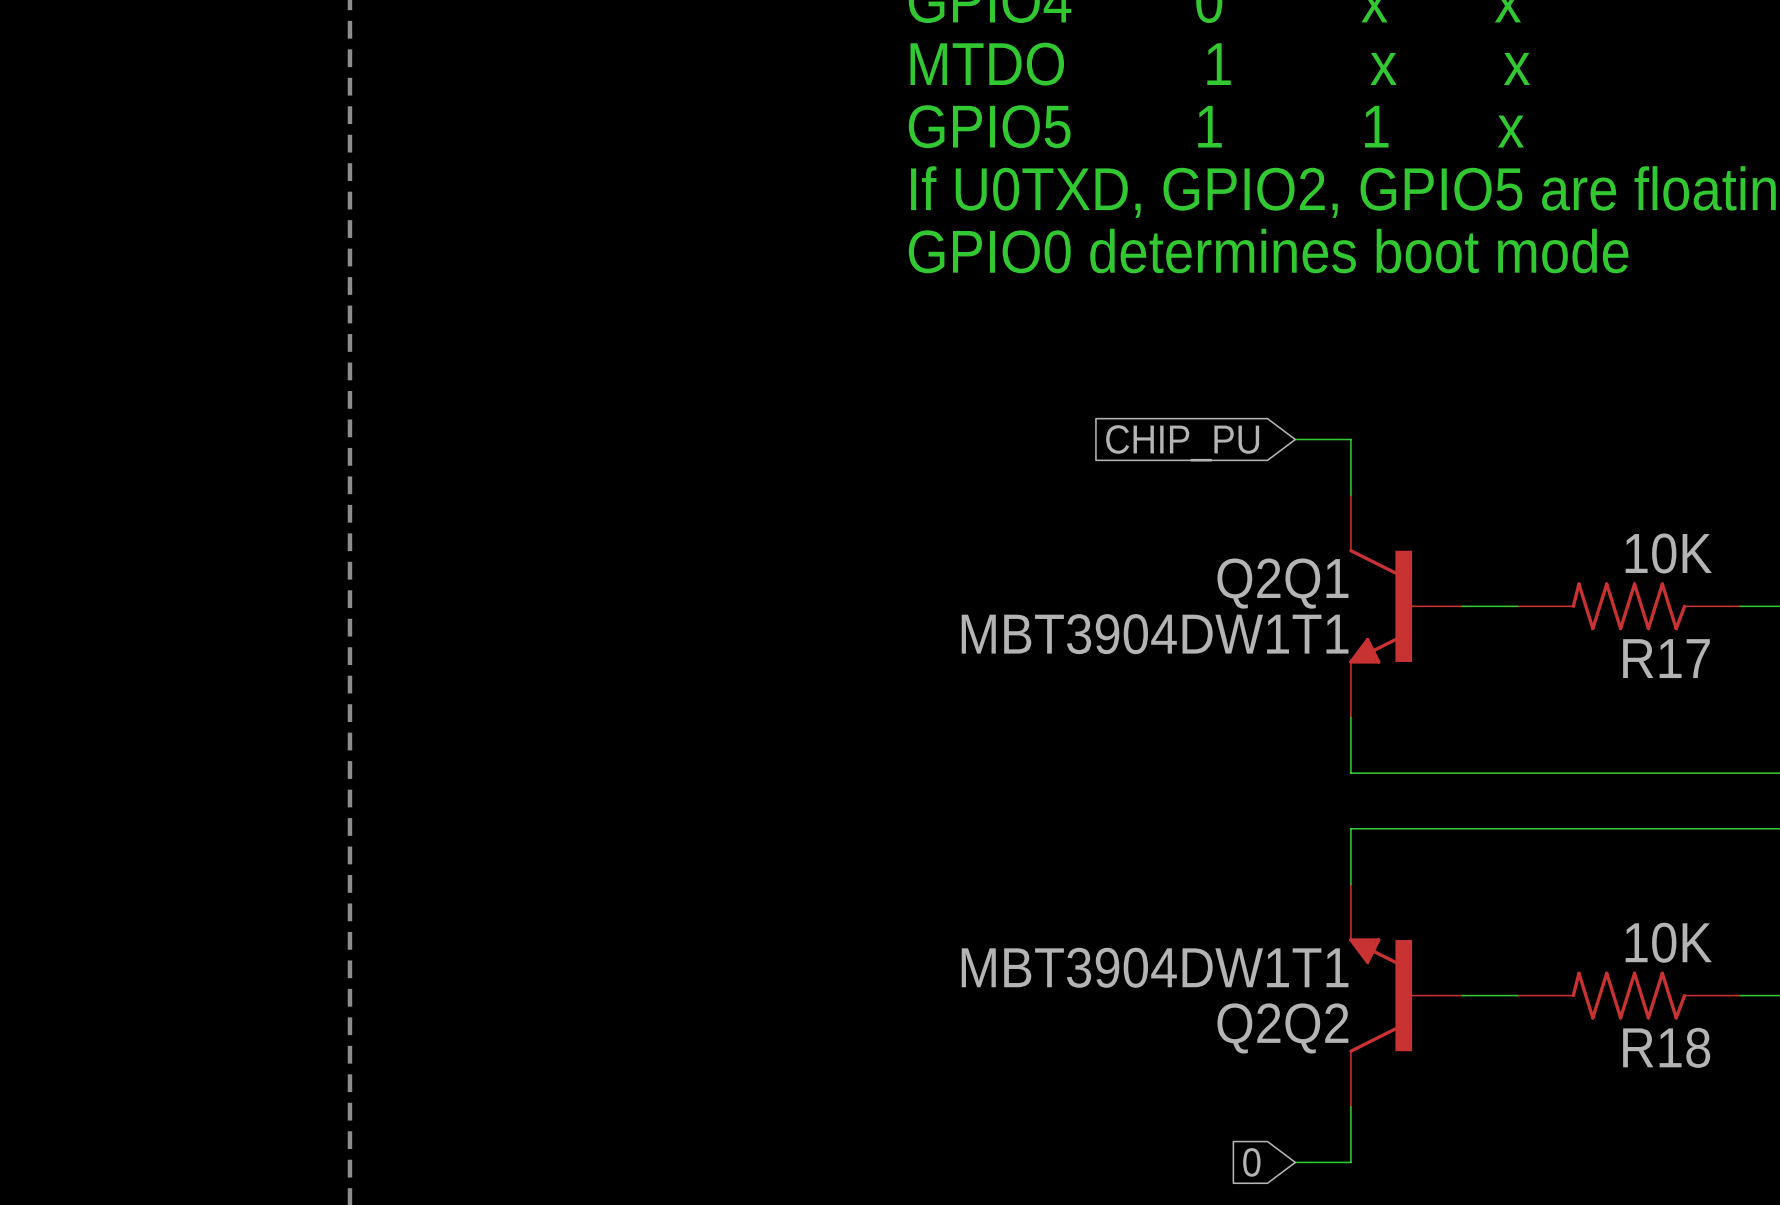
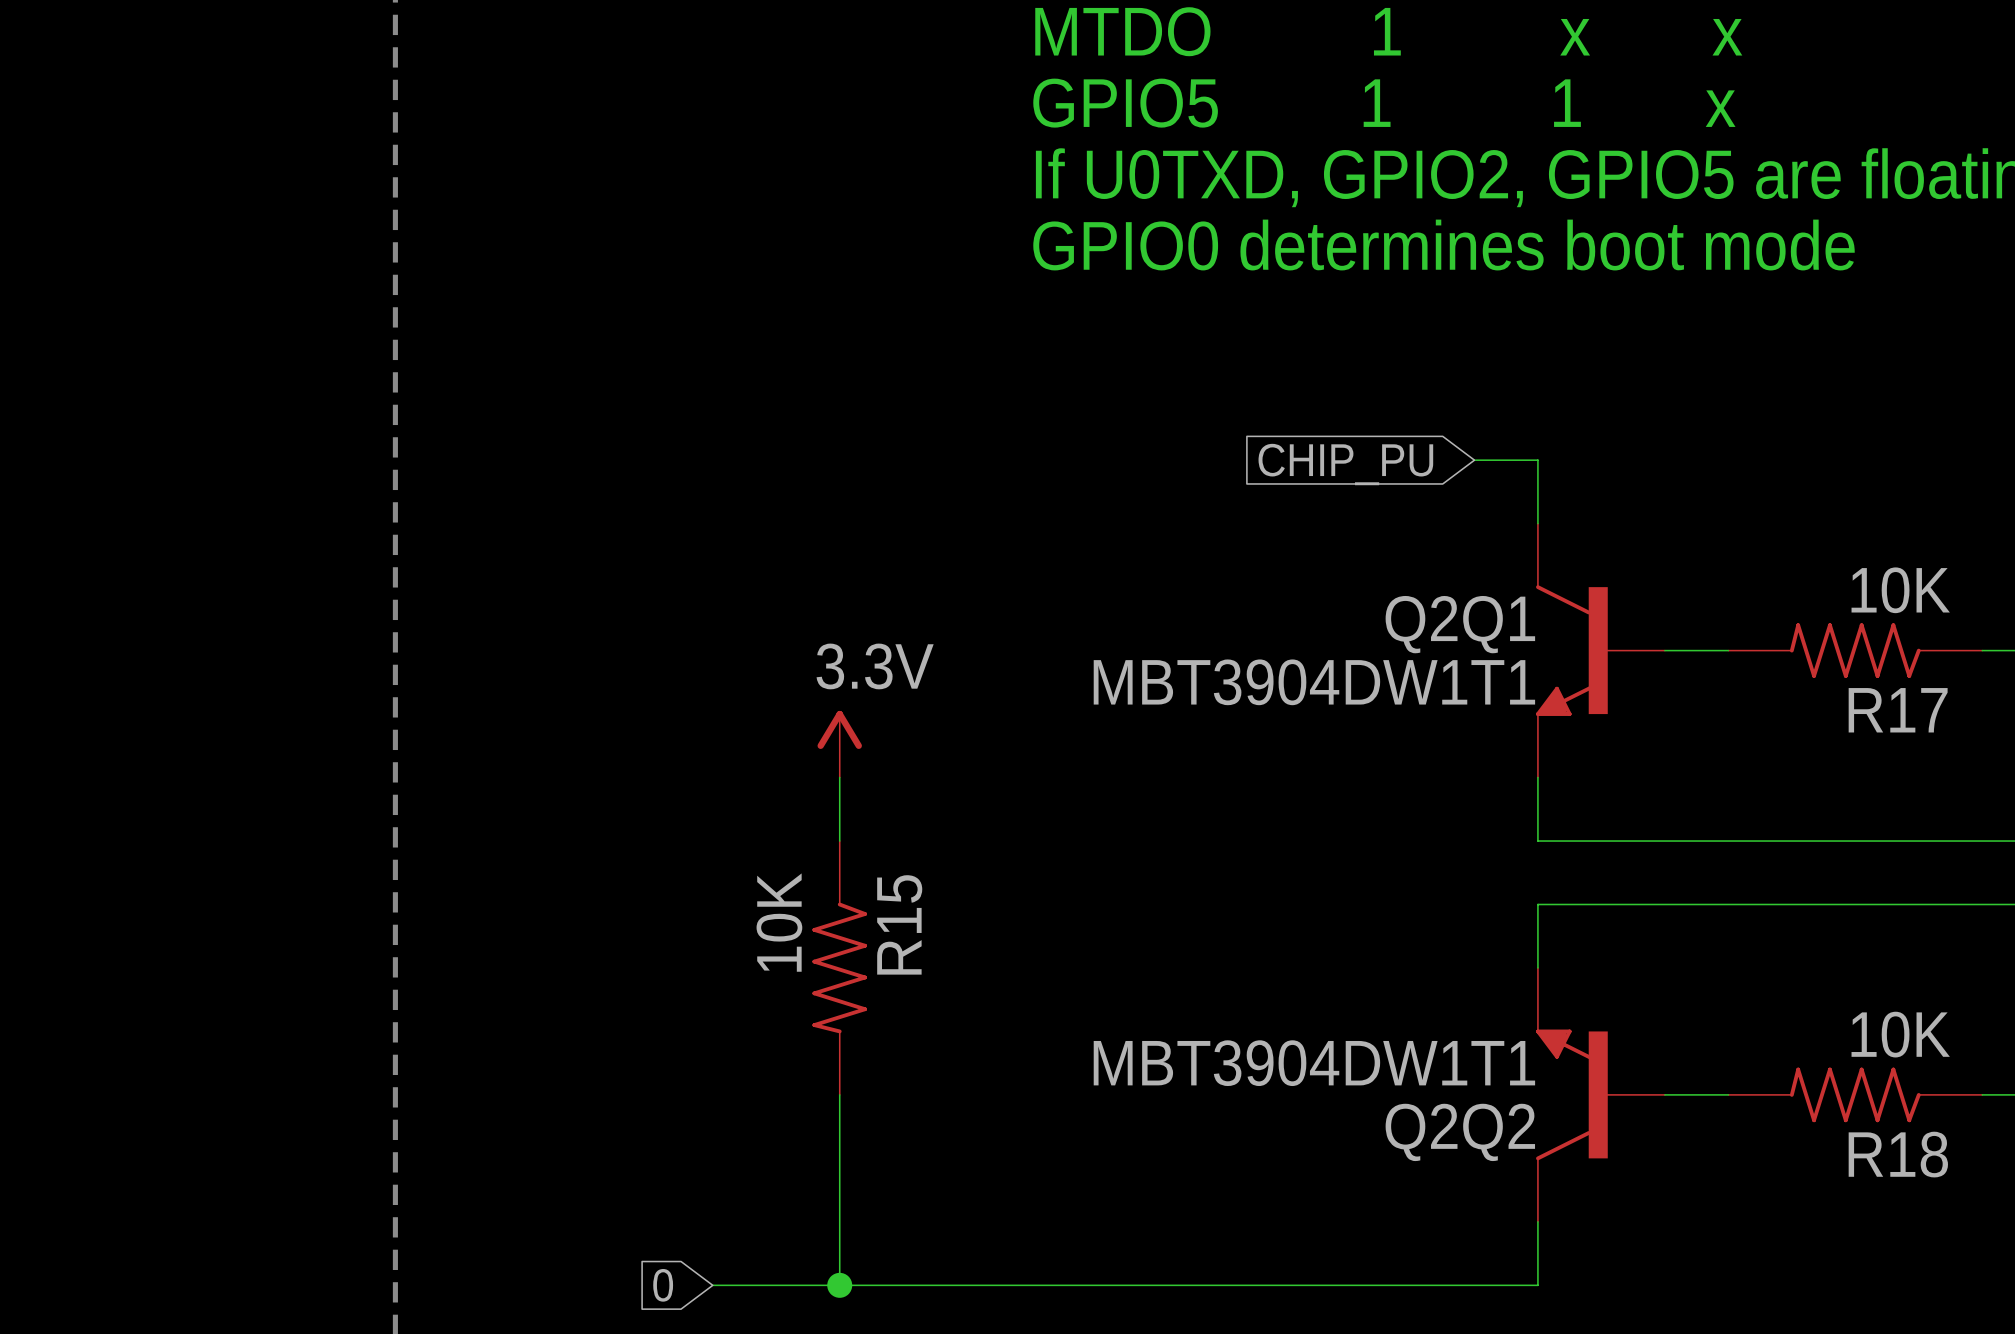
power symbol: none -> 3.3V (839, 744)
wire: none -> (839, 777) (839, 841)
R15: none -> 10K (839, 967)
wire: none -> (839, 1094) (839, 1285)
global label: none -> 0 (663, 1285)
wire: none -> (712, 1285) (1474, 1285)
junction: none -> (839, 1285)
global label: 0 (1251, 1162) -> none

